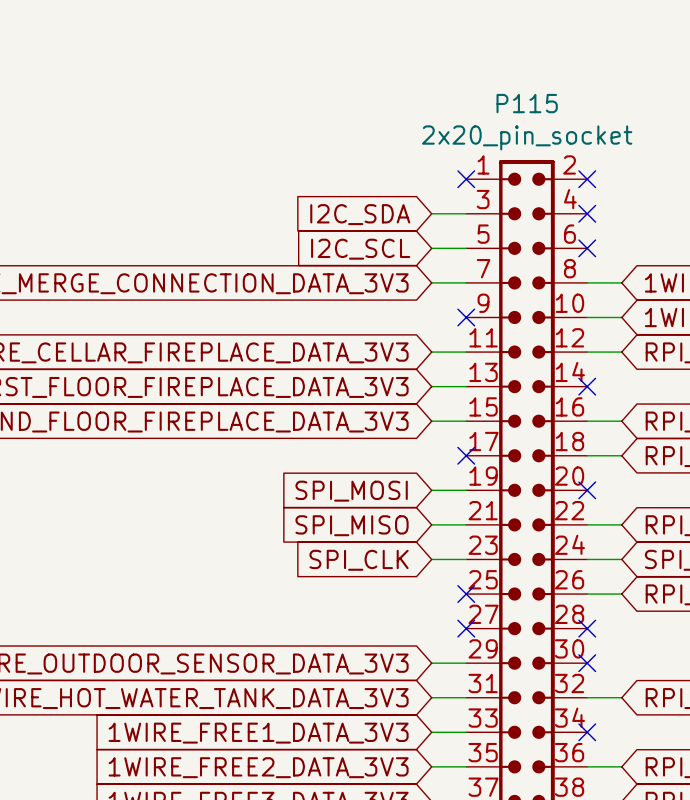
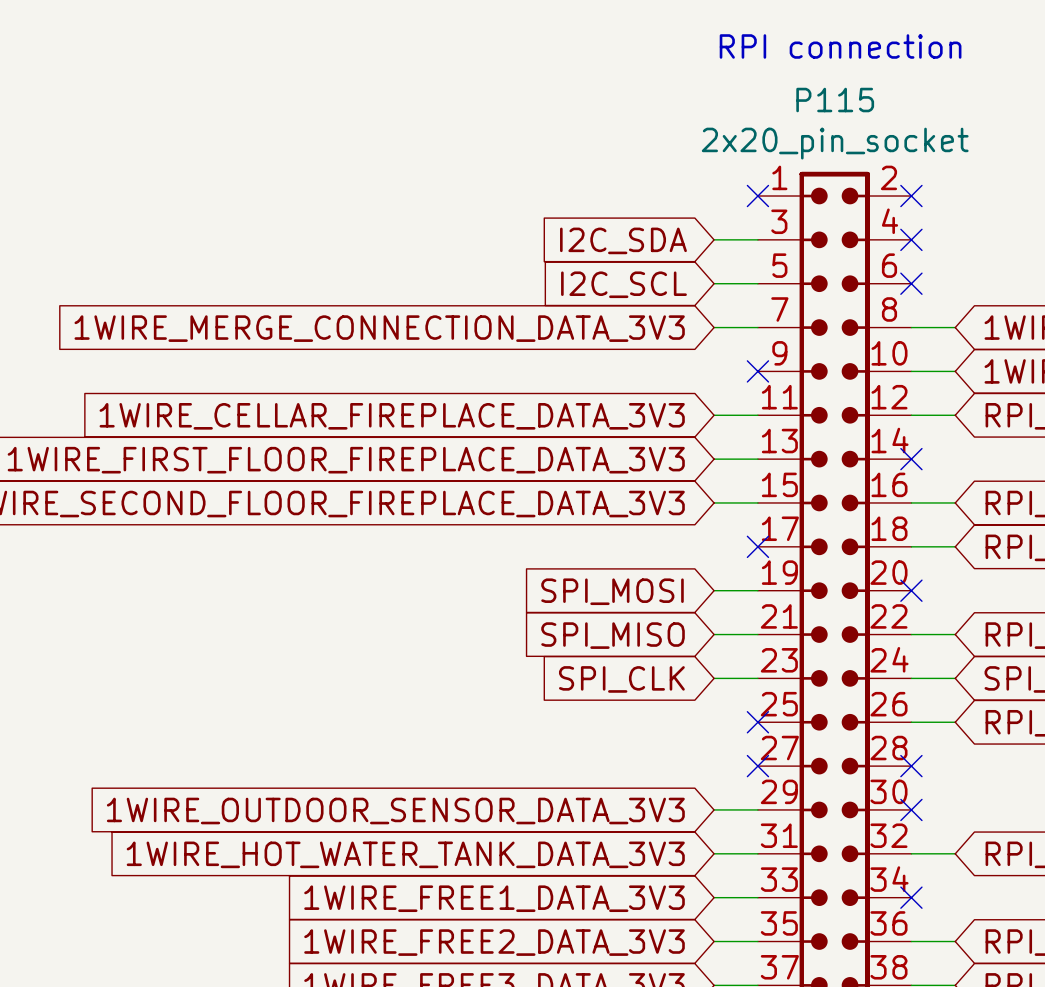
text: none -> RPI connection (840, 46)

